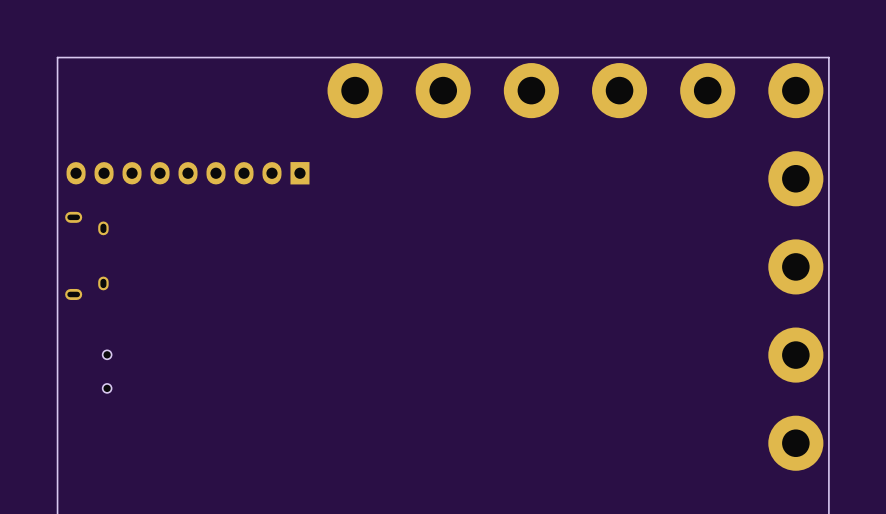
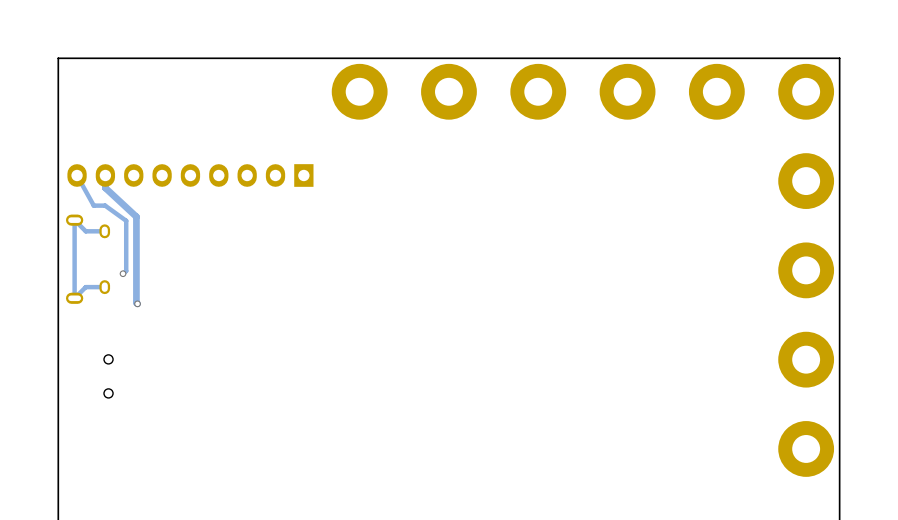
track: none -> (77, 175) (93, 205) (105, 205) (126, 220) (126, 271) (123, 273)
track: none -> (105, 175) (105, 187) (136, 216) (137, 303)
track: none -> (104, 231) (85, 231) (74, 220) (74, 298) (85, 287) (104, 287)
via: none -> (123, 273)
via: none -> (137, 303)

